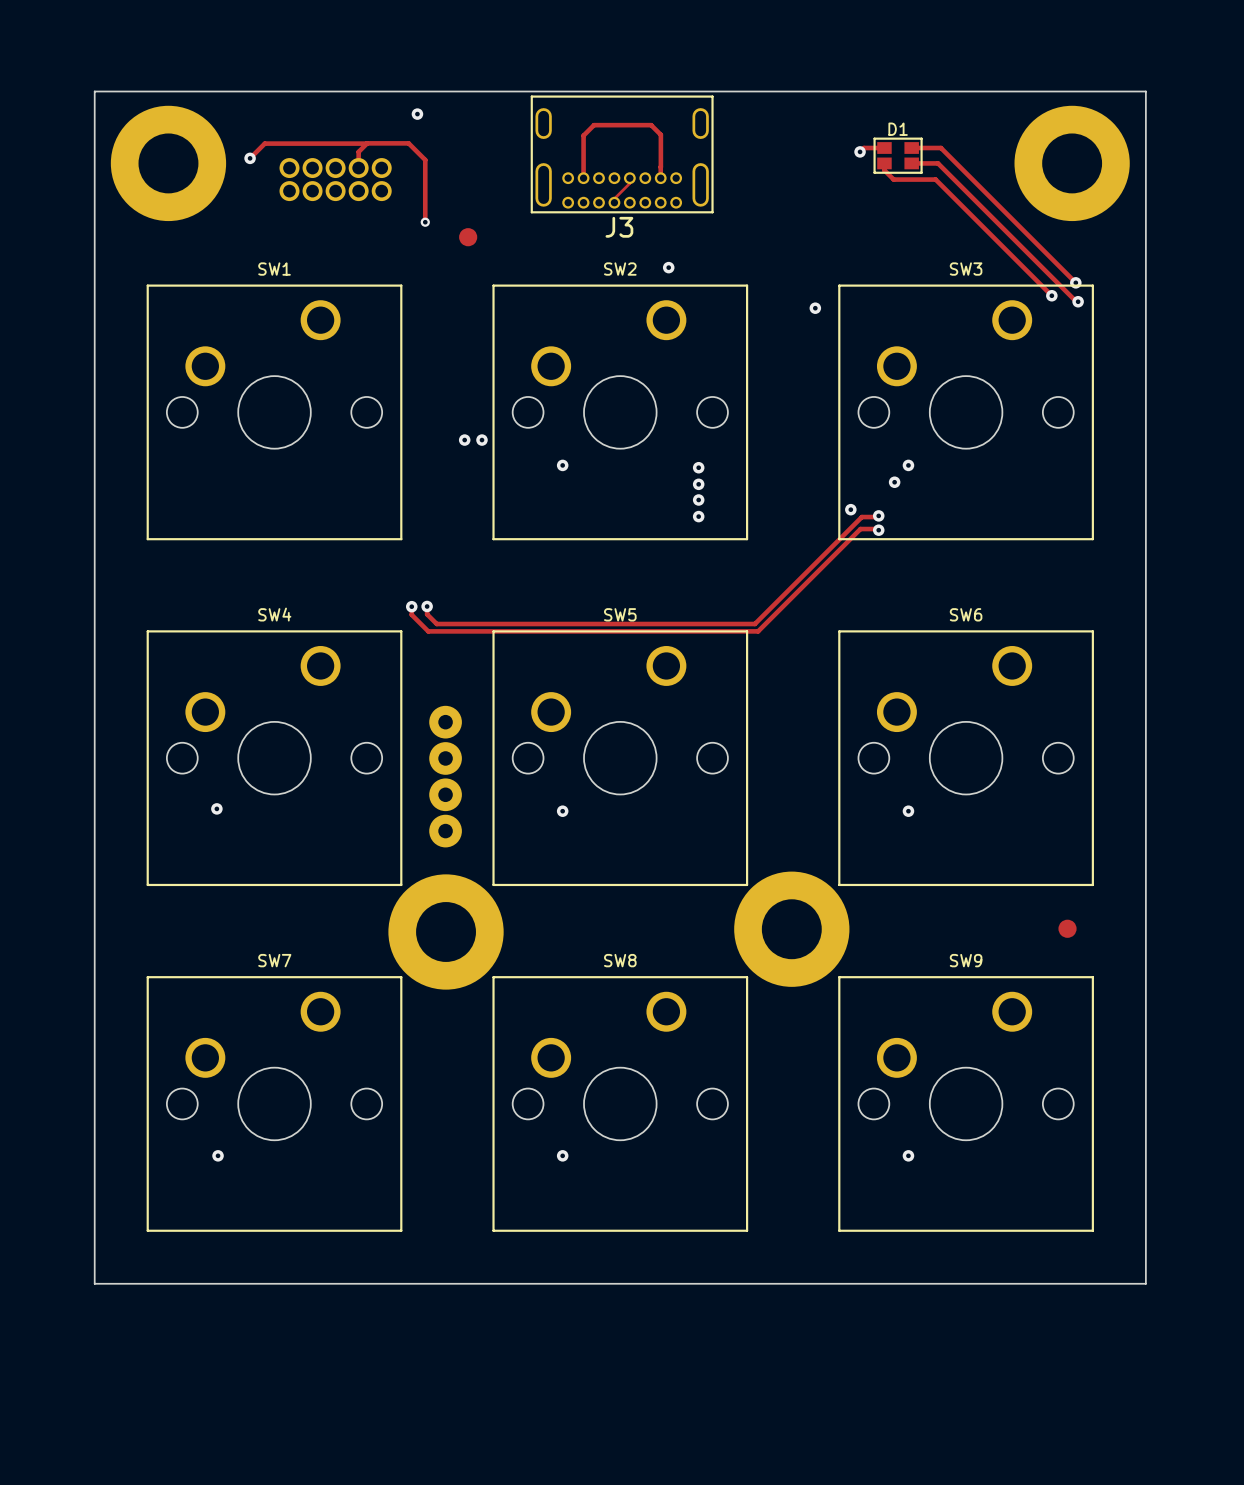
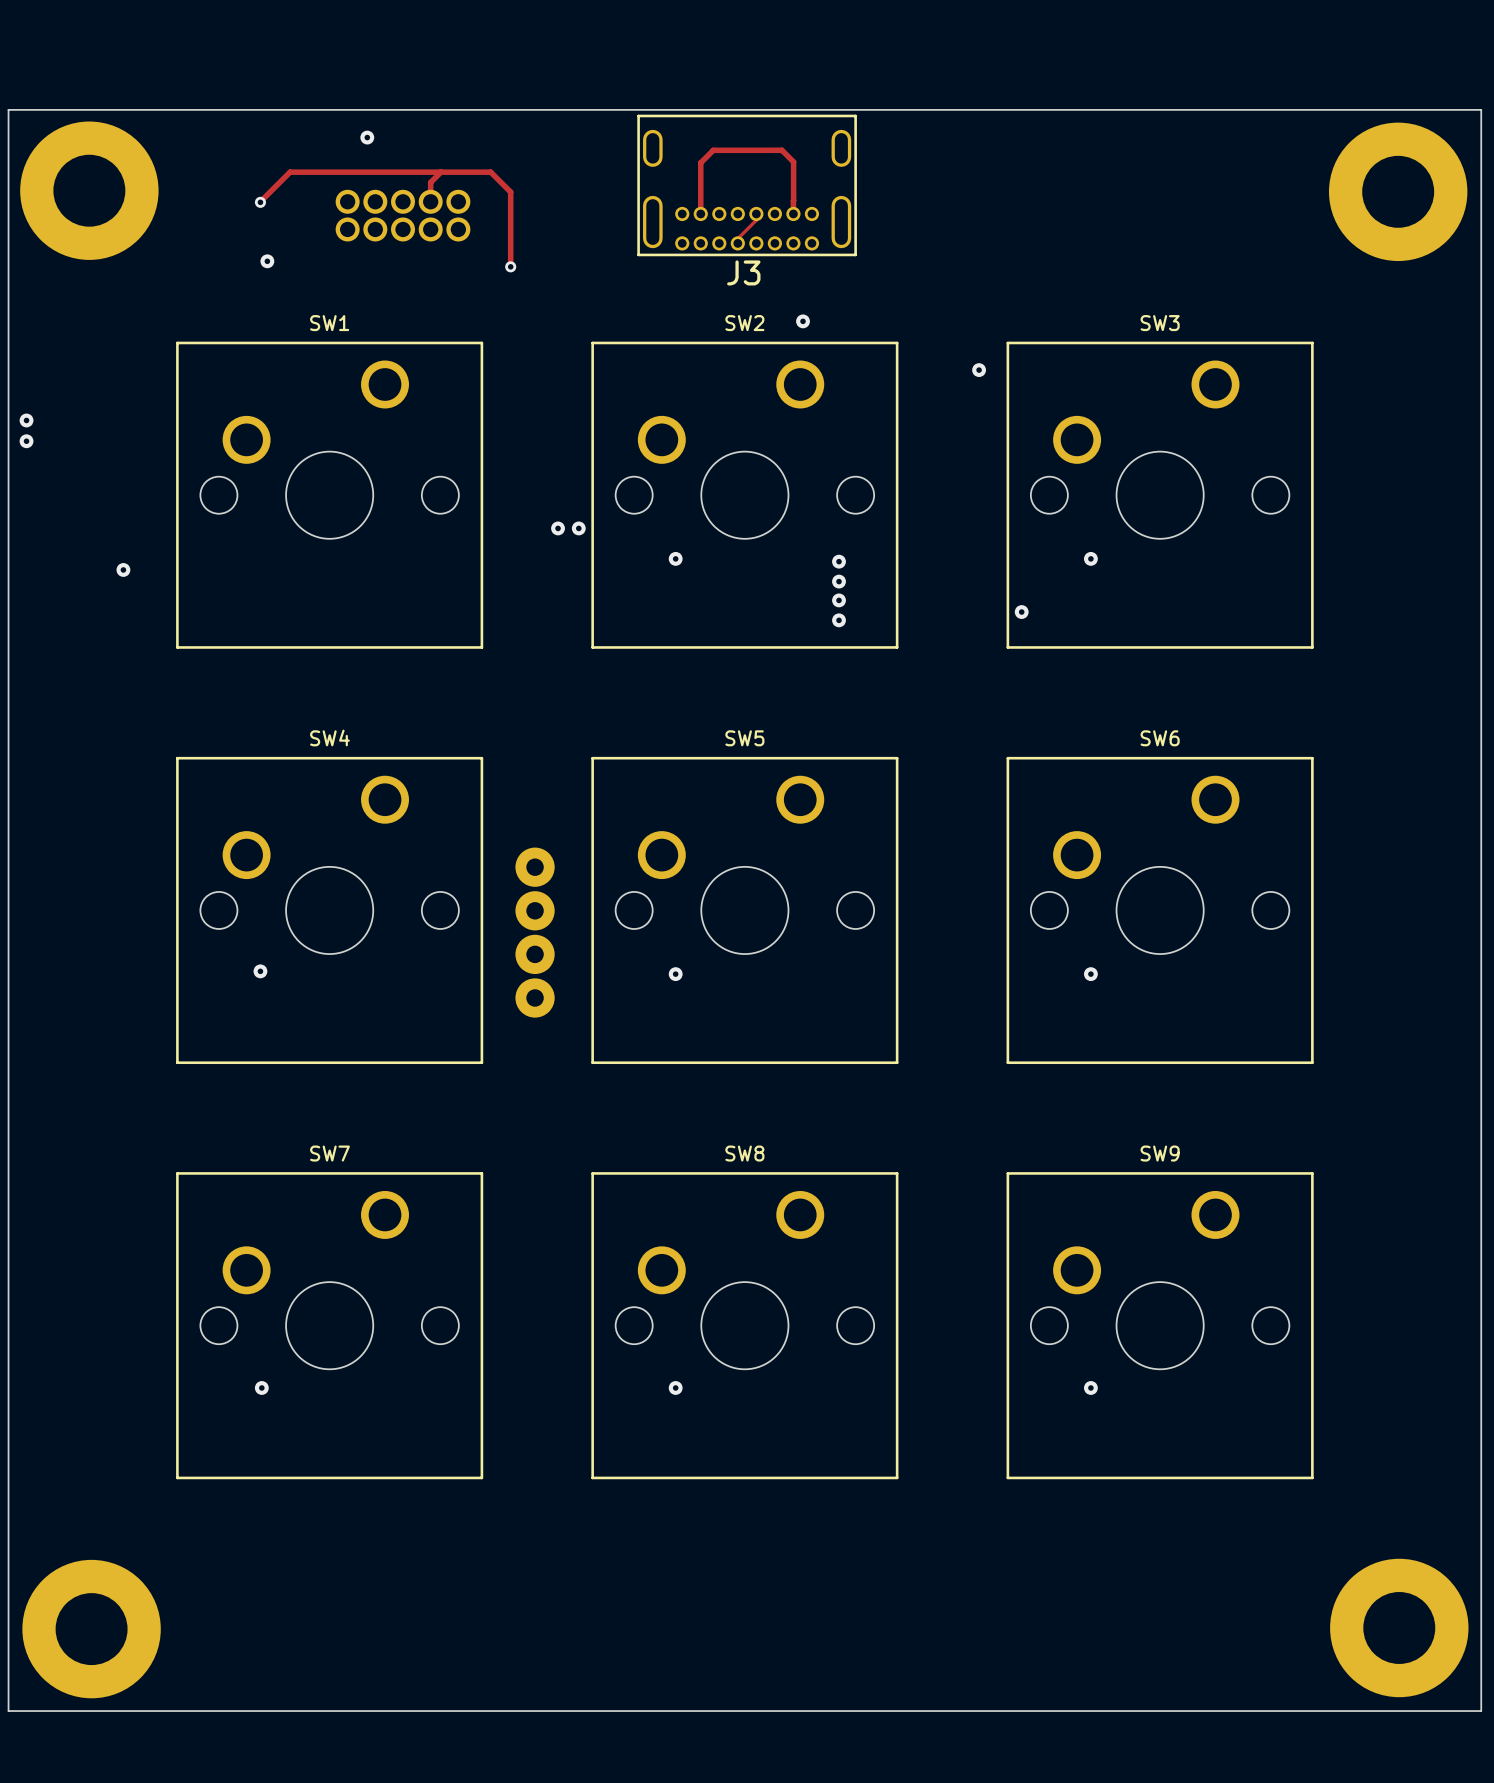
board edge: (94, 91) (94, 1283) (1145, 1283) (1145, 91) -> (113, 109) (8, 109) (8, 1711) (1481, 1711) (1481, 109) (1376, 109)
via: none -> (367, 137)
via: (417, 114) -> none
track: (366, 143) (264, 143) (250, 158) -> (440, 172) (290, 172) (260, 202)
track: (884, 148) (863, 148) (860, 151) -> none
track: (911, 148) (940, 148) (1075, 282) -> none
via: (860, 151) -> none
D1: (898, 155) -> none
via: (250, 158) -> none
part position: (168, 163) -> (89, 190)
track: (884, 163) (884, 170) (893, 179) (935, 179) (1051, 295) -> none
track: (911, 163) (938, 163) (1078, 301) -> none
part position: (1072, 163) -> (1398, 191)
via: none -> (260, 202)
via: none -> (267, 261)
part: (468, 237) -> none
via: (1075, 282) -> none
via: (1051, 295) -> none
via: (1078, 301) -> none
via: none -> (26, 420)
via: none -> (26, 441)
via: none -> (123, 569)
via: (894, 482) -> none
track: (878, 515) (861, 517) (754, 624) (436, 624) (427, 614) (427, 606) -> none
via: (878, 515) -> none
track: (878, 530) (860, 529) (758, 631) (428, 631) (411, 614) (411, 606) -> none
via: (878, 530) -> none
via: (411, 606) -> none
via: (427, 606) -> none
part: (1067, 928) -> none
part: (791, 929) -> none
part: (446, 931) -> none
part: none -> (1399, 1627)
part: none -> (91, 1629)

